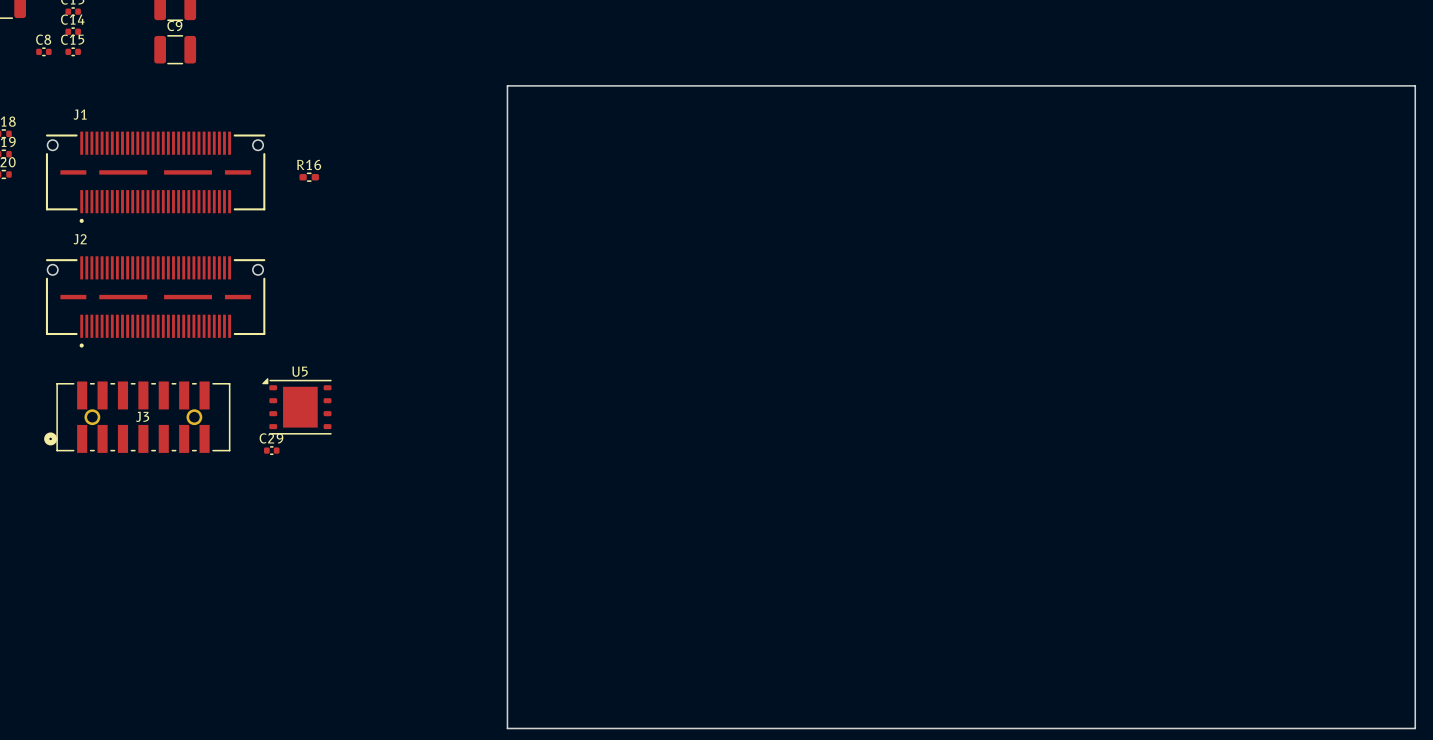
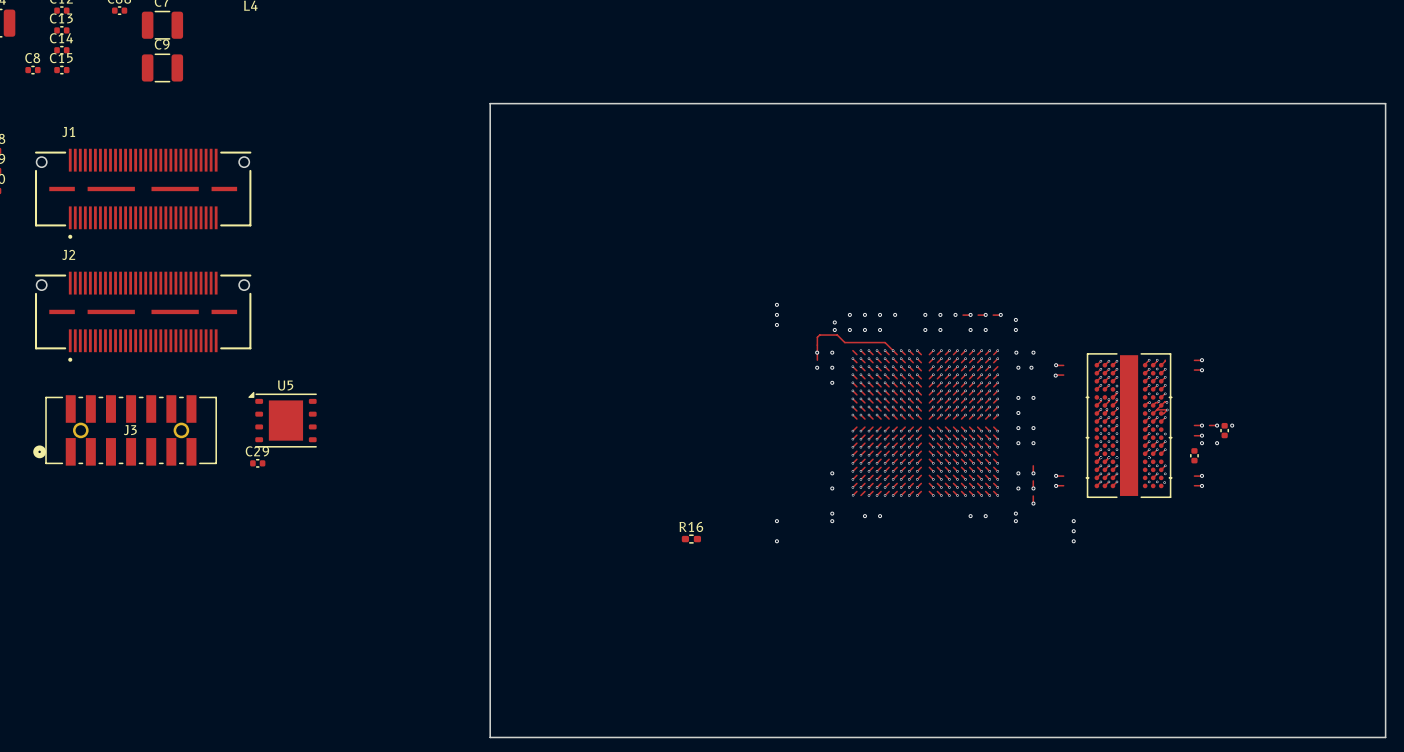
R16 position: (309, 177) -> (691, 539)
via: none -> (776, 304)
via: none -> (776, 314)
via: none -> (849, 314)
via: none -> (864, 314)
via: none -> (880, 314)
via: none -> (895, 314)
via: none -> (925, 314)
via: none -> (940, 314)
via: none -> (955, 314)
track: none -> (970, 314) (963, 315)
via: none -> (970, 314)
track: none -> (985, 314) (978, 315)
via: none -> (985, 314)
track: none -> (1000, 314) (993, 315)
via: none -> (1000, 314)
via: none -> (1015, 319)
via: none -> (834, 322)
via: none -> (776, 324)
via: none -> (834, 330)
via: none -> (849, 330)
via: none -> (864, 330)
via: none -> (880, 330)
via: none -> (925, 330)
via: none -> (940, 330)
via: none -> (970, 330)
via: none -> (985, 330)
via: none -> (1015, 330)
track: none -> (852, 350) (856, 354)
track: none -> (860, 350) (864, 354)
via: none -> (860, 350)
track: none -> (868, 350) (873, 354)
via: none -> (868, 350)
track: none -> (877, 350) (881, 354)
via: none -> (877, 350)
track: none -> (885, 350) (889, 354)
via: none -> (885, 350)
via: none -> (893, 350)
track: none -> (901, 350) (905, 354)
via: none -> (901, 350)
track: none -> (909, 350) (913, 354)
via: none -> (909, 350)
track: none -> (917, 350) (921, 354)
via: none -> (917, 350)
track: none -> (933, 350) (929, 354)
via: none -> (933, 350)
track: none -> (941, 350) (937, 354)
via: none -> (941, 350)
track: none -> (949, 350) (945, 354)
via: none -> (949, 350)
track: none -> (957, 350) (953, 354)
via: none -> (957, 350)
track: none -> (965, 350) (961, 354)
via: none -> (965, 350)
track: none -> (973, 350) (969, 354)
via: none -> (973, 350)
track: none -> (981, 350) (977, 354)
via: none -> (981, 350)
track: none -> (989, 350) (985, 354)
via: none -> (989, 350)
track: none -> (997, 350) (993, 354)
via: none -> (997, 350)
via: none -> (817, 352)
via: none -> (832, 352)
via: none -> (1016, 352)
via: none -> (1033, 352)
track: none -> (897, 354) (885, 342) (844, 342) (837, 335) (819, 335) (817, 337) (817, 360)
track: none -> (852, 358) (856, 362)
via: none -> (852, 358)
track: none -> (860, 358) (864, 362)
via: none -> (860, 358)
track: none -> (868, 358) (873, 362)
via: none -> (868, 358)
track: none -> (877, 358) (881, 362)
via: none -> (877, 358)
track: none -> (885, 358) (889, 362)
via: none -> (885, 358)
track: none -> (893, 358) (897, 362)
via: none -> (893, 358)
track: none -> (901, 358) (905, 362)
via: none -> (901, 358)
track: none -> (909, 358) (913, 362)
via: none -> (909, 358)
track: none -> (917, 358) (921, 362)
via: none -> (917, 358)
track: none -> (933, 358) (929, 362)
via: none -> (933, 358)
track: none -> (941, 358) (937, 362)
via: none -> (941, 358)
track: none -> (949, 358) (945, 362)
via: none -> (949, 358)
track: none -> (957, 358) (953, 362)
via: none -> (957, 358)
track: none -> (965, 358) (961, 362)
via: none -> (965, 358)
track: none -> (973, 358) (969, 362)
via: none -> (973, 358)
track: none -> (981, 358) (977, 362)
via: none -> (981, 358)
track: none -> (989, 358) (985, 362)
via: none -> (989, 358)
track: none -> (997, 358) (993, 362)
via: none -> (997, 358)
track: none -> (1149, 360) (1145, 365)
via: none -> (1149, 360)
track: none -> (1157, 360) (1153, 365)
via: none -> (1157, 360)
track: none -> (1165, 360) (1161, 365)
track: none -> (1202, 360) (1194, 360)
via: none -> (1202, 360)
track: none -> (1100, 361) (1096, 365)
via: none -> (1100, 361)
track: none -> (1108, 361) (1104, 365)
via: none -> (1108, 361)
track: none -> (1116, 361) (1112, 365)
via: none -> (1116, 361)
track: none -> (1056, 365) (1063, 365)
via: none -> (1056, 365)
track: none -> (852, 366) (856, 370)
via: none -> (852, 366)
track: none -> (860, 366) (864, 370)
via: none -> (860, 366)
track: none -> (868, 366) (873, 370)
via: none -> (868, 366)
track: none -> (877, 366) (881, 370)
via: none -> (877, 366)
track: none -> (885, 366) (889, 370)
via: none -> (885, 366)
track: none -> (893, 366) (897, 370)
via: none -> (893, 366)
track: none -> (901, 366) (905, 370)
via: none -> (901, 366)
track: none -> (909, 366) (913, 370)
via: none -> (909, 366)
track: none -> (917, 366) (921, 370)
via: none -> (917, 366)
track: none -> (933, 366) (929, 370)
via: none -> (933, 366)
track: none -> (941, 366) (937, 370)
via: none -> (941, 366)
track: none -> (949, 366) (945, 370)
via: none -> (949, 366)
track: none -> (957, 366) (953, 370)
via: none -> (957, 366)
track: none -> (965, 366) (961, 370)
via: none -> (965, 366)
track: none -> (973, 366) (969, 370)
via: none -> (973, 366)
track: none -> (981, 366) (977, 370)
via: none -> (981, 366)
track: none -> (989, 366) (985, 370)
via: none -> (989, 366)
track: none -> (997, 366) (993, 370)
via: none -> (817, 367)
via: none -> (832, 367)
via: none -> (1018, 367)
via: none -> (1031, 367)
via: none -> (1157, 369)
track: none -> (1100, 369) (1096, 373)
via: none -> (1100, 369)
track: none -> (1108, 369) (1104, 373)
via: none -> (1108, 369)
track: none -> (1116, 369) (1112, 373)
via: none -> (1116, 369)
track: none -> (1149, 369) (1145, 373)
via: none -> (1149, 369)
track: none -> (1165, 369) (1161, 373)
via: none -> (1165, 369)
track: none -> (1194, 370) (1202, 370)
via: none -> (1202, 370)
track: none -> (852, 374) (856, 378)
via: none -> (852, 374)
track: none -> (860, 374) (864, 378)
via: none -> (860, 374)
track: none -> (868, 374) (873, 378)
via: none -> (868, 374)
track: none -> (877, 374) (881, 378)
via: none -> (877, 374)
track: none -> (885, 374) (889, 378)
via: none -> (885, 374)
track: none -> (893, 374) (897, 378)
via: none -> (893, 374)
track: none -> (901, 374) (905, 378)
via: none -> (901, 374)
track: none -> (909, 374) (913, 378)
via: none -> (909, 374)
track: none -> (917, 374) (921, 378)
via: none -> (917, 374)
track: none -> (933, 374) (929, 378)
via: none -> (933, 374)
track: none -> (941, 374) (937, 378)
via: none -> (941, 374)
track: none -> (949, 374) (945, 378)
via: none -> (949, 374)
track: none -> (957, 374) (953, 378)
via: none -> (957, 374)
track: none -> (965, 374) (961, 378)
via: none -> (965, 374)
track: none -> (973, 374) (969, 378)
via: none -> (973, 374)
track: none -> (981, 374) (977, 378)
via: none -> (981, 374)
track: none -> (989, 374) (985, 378)
via: none -> (989, 374)
track: none -> (997, 374) (993, 378)
via: none -> (997, 374)
via: none -> (1055, 375)
track: none -> (1063, 375) (1055, 375)
track: none -> (1100, 377) (1096, 381)
via: none -> (1100, 377)
track: none -> (1108, 377) (1104, 381)
via: none -> (1108, 377)
track: none -> (1116, 377) (1112, 381)
via: none -> (1116, 377)
track: none -> (1149, 377) (1145, 381)
via: none -> (1149, 377)
track: none -> (1157, 377) (1153, 381)
via: none -> (1157, 377)
track: none -> (1165, 377) (1161, 381)
via: none -> (1165, 377)
via: none -> (832, 382)
track: none -> (852, 382) (856, 386)
via: none -> (852, 382)
track: none -> (860, 382) (864, 386)
via: none -> (860, 382)
track: none -> (868, 382) (873, 386)
via: none -> (868, 382)
track: none -> (877, 382) (881, 386)
via: none -> (877, 382)
track: none -> (885, 382) (889, 386)
via: none -> (885, 382)
track: none -> (893, 382) (897, 386)
via: none -> (893, 382)
track: none -> (901, 382) (905, 386)
via: none -> (901, 382)
track: none -> (909, 382) (913, 386)
via: none -> (909, 382)
track: none -> (917, 382) (921, 386)
via: none -> (917, 382)
track: none -> (933, 382) (929, 386)
via: none -> (933, 382)
track: none -> (941, 382) (937, 386)
via: none -> (941, 382)
track: none -> (949, 382) (945, 386)
via: none -> (949, 382)
track: none -> (957, 382) (953, 386)
via: none -> (957, 382)
track: none -> (965, 382) (961, 386)
via: none -> (965, 382)
track: none -> (973, 382) (969, 386)
via: none -> (973, 382)
track: none -> (981, 382) (977, 386)
via: none -> (981, 382)
track: none -> (989, 382) (985, 386)
via: none -> (989, 382)
track: none -> (997, 382) (993, 386)
via: none -> (997, 382)
track: none -> (1100, 385) (1096, 389)
via: none -> (1100, 385)
track: none -> (1108, 385) (1104, 389)
via: none -> (1108, 385)
track: none -> (1149, 385) (1145, 389)
via: none -> (1149, 385)
track: none -> (1157, 385) (1153, 389)
via: none -> (1157, 385)
track: none -> (1165, 385) (1161, 389)
via: none -> (1165, 385)
via: none -> (1116, 386)
track: none -> (852, 390) (856, 394)
via: none -> (852, 390)
track: none -> (860, 390) (864, 394)
via: none -> (860, 390)
track: none -> (868, 390) (873, 394)
via: none -> (868, 390)
track: none -> (877, 390) (881, 394)
via: none -> (877, 390)
track: none -> (885, 390) (889, 394)
via: none -> (885, 390)
track: none -> (893, 390) (897, 394)
via: none -> (893, 390)
track: none -> (901, 390) (905, 394)
via: none -> (901, 390)
track: none -> (909, 390) (913, 394)
via: none -> (909, 390)
track: none -> (917, 390) (921, 394)
via: none -> (917, 390)
track: none -> (933, 390) (929, 394)
via: none -> (933, 390)
track: none -> (941, 390) (937, 394)
via: none -> (941, 390)
track: none -> (949, 390) (945, 394)
via: none -> (949, 390)
track: none -> (957, 390) (953, 394)
via: none -> (957, 390)
track: none -> (965, 390) (961, 394)
via: none -> (965, 390)
track: none -> (973, 390) (969, 394)
via: none -> (973, 390)
track: none -> (981, 390) (977, 394)
via: none -> (981, 390)
track: none -> (989, 390) (985, 394)
via: none -> (989, 390)
track: none -> (997, 390) (993, 394)
via: none -> (997, 390)
via: none -> (1116, 392)
track: none -> (1116, 393) (1112, 397) (1116, 393)
via: none -> (1149, 393)
via: none -> (1157, 393)
track: none -> (1165, 393) (1161, 397)
via: none -> (1165, 393)
via: none -> (1018, 397)
via: none -> (1033, 397)
track: none -> (852, 398) (856, 402)
via: none -> (852, 398)
track: none -> (860, 398) (864, 402)
via: none -> (860, 398)
track: none -> (868, 398) (873, 402)
via: none -> (868, 398)
track: none -> (877, 398) (881, 402)
via: none -> (877, 398)
track: none -> (885, 398) (889, 402)
via: none -> (885, 398)
track: none -> (893, 398) (897, 402)
via: none -> (893, 398)
track: none -> (901, 398) (905, 402)
via: none -> (901, 398)
track: none -> (909, 398) (913, 402)
via: none -> (909, 398)
track: none -> (917, 398) (921, 402)
via: none -> (917, 398)
track: none -> (933, 398) (929, 402)
via: none -> (933, 398)
track: none -> (941, 398) (937, 402)
via: none -> (941, 398)
track: none -> (949, 398) (945, 402)
via: none -> (949, 398)
track: none -> (957, 398) (953, 402)
via: none -> (957, 398)
track: none -> (965, 398) (961, 402)
via: none -> (965, 398)
track: none -> (973, 398) (969, 402)
via: none -> (973, 398)
track: none -> (981, 398) (977, 402)
via: none -> (981, 398)
track: none -> (989, 398) (985, 402)
via: none -> (989, 398)
track: none -> (997, 398) (993, 402)
via: none -> (997, 398)
track: none -> (1100, 399) (1096, 405)
via: none -> (1100, 399)
track: none -> (1108, 399) (1104, 405)
via: none -> (1108, 399)
track: none -> (1116, 399) (1112, 405)
via: none -> (1116, 399)
track: none -> (1158, 401) (1153, 405)
via: none -> (1158, 401)
track: none -> (1166, 402) (1164, 401) (1157, 409) (1167, 409)
via: none -> (1166, 402)
track: none -> (1149, 402) (1145, 405)
via: none -> (1149, 402)
track: none -> (852, 406) (856, 410)
via: none -> (852, 406)
track: none -> (860, 406) (864, 410)
via: none -> (860, 406)
track: none -> (868, 406) (873, 410)
via: none -> (868, 406)
track: none -> (877, 406) (881, 410)
via: none -> (877, 406)
track: none -> (885, 406) (889, 410)
via: none -> (885, 406)
track: none -> (893, 406) (897, 410)
via: none -> (893, 406)
track: none -> (901, 406) (905, 410)
via: none -> (901, 406)
track: none -> (909, 406) (913, 410)
via: none -> (909, 406)
track: none -> (917, 406) (921, 410)
via: none -> (917, 406)
track: none -> (933, 406) (929, 410)
via: none -> (933, 406)
track: none -> (941, 406) (937, 410)
via: none -> (941, 406)
track: none -> (949, 406) (945, 410)
via: none -> (949, 406)
track: none -> (957, 406) (953, 410)
via: none -> (957, 406)
track: none -> (965, 406) (961, 410)
via: none -> (965, 406)
track: none -> (973, 406) (969, 410)
via: none -> (973, 406)
track: none -> (981, 406) (977, 410)
via: none -> (981, 406)
track: none -> (989, 406) (985, 410)
via: none -> (989, 406)
track: none -> (997, 406) (993, 410)
via: none -> (997, 406)
track: none -> (1117, 408) (1112, 413)
via: none -> (1117, 408)
track: none -> (1100, 409) (1096, 413)
via: none -> (1100, 409)
track: none -> (1106, 409) (1104, 413)
via: none -> (1106, 409)
via: none -> (1149, 410)
track: none -> (1157, 409) (1153, 413)
track: none -> (1167, 409) (1161, 413)
via: none -> (1167, 409)
via: none -> (1018, 413)
track: none -> (852, 415) (856, 419)
via: none -> (852, 415)
track: none -> (860, 415) (864, 419)
via: none -> (860, 415)
track: none -> (868, 415) (873, 419)
via: none -> (868, 415)
track: none -> (877, 415) (881, 419)
via: none -> (877, 415)
track: none -> (885, 415) (889, 419)
via: none -> (885, 415)
track: none -> (893, 415) (897, 419)
via: none -> (893, 415)
track: none -> (901, 415) (905, 419)
via: none -> (901, 415)
track: none -> (909, 415) (913, 419)
via: none -> (909, 415)
track: none -> (917, 415) (921, 419)
via: none -> (917, 415)
track: none -> (933, 415) (929, 419)
via: none -> (933, 415)
track: none -> (941, 415) (937, 419)
via: none -> (941, 415)
track: none -> (949, 415) (945, 419)
via: none -> (949, 415)
track: none -> (957, 415) (953, 419)
via: none -> (957, 415)
track: none -> (965, 415) (961, 419)
via: none -> (965, 415)
track: none -> (973, 415) (969, 419)
via: none -> (973, 415)
track: none -> (981, 415) (977, 419)
via: none -> (981, 415)
track: none -> (989, 415) (985, 419)
via: none -> (989, 415)
track: none -> (997, 415) (993, 419)
via: none -> (997, 415)
track: none -> (1100, 417) (1096, 421)
via: none -> (1100, 417)
track: none -> (1108, 417) (1104, 421)
via: none -> (1108, 417)
track: none -> (1116, 417) (1112, 421) (1116, 417)
via: none -> (1116, 417)
track: none -> (1149, 417) (1145, 421)
via: none -> (1149, 417)
track: none -> (1157, 417) (1153, 421) (1157, 417)
via: none -> (1157, 417)
track: none -> (1165, 417) (1161, 421)
via: none -> (1165, 417)
via: none -> (1100, 426)
via: none -> (1108, 426)
track: none -> (1116, 425) (1112, 429)
via: none -> (1116, 425)
part: none -> (1129, 425)
track: none -> (1149, 425) (1145, 429)
via: none -> (1149, 425)
via: none -> (1157, 426)
track: none -> (1194, 425) (1201, 425)
via: none -> (1202, 425)
track: none -> (1209, 425) (1216, 425)
via: none -> (1217, 425)
via: none -> (1232, 425)
track: none -> (856, 427) (852, 431)
track: none -> (864, 427) (860, 431)
track: none -> (873, 427) (868, 431)
track: none -> (881, 427) (877, 431)
track: none -> (889, 427) (885, 431)
track: none -> (897, 427) (893, 431)
track: none -> (905, 427) (901, 431)
track: none -> (913, 427) (909, 431)
track: none -> (921, 427) (917, 431)
track: none -> (929, 427) (933, 431)
track: none -> (937, 427) (941, 431)
track: none -> (945, 427) (949, 431)
track: none -> (953, 427) (957, 431)
track: none -> (961, 427) (965, 431)
track: none -> (969, 427) (973, 431)
track: none -> (977, 427) (981, 431)
track: none -> (985, 427) (989, 431)
track: none -> (993, 427) (997, 431)
via: none -> (1018, 428)
via: none -> (1033, 428)
via: none -> (852, 431)
via: none -> (860, 431)
via: none -> (868, 431)
via: none -> (877, 431)
via: none -> (885, 431)
via: none -> (893, 431)
via: none -> (901, 431)
via: none -> (909, 431)
via: none -> (917, 431)
via: none -> (933, 431)
via: none -> (941, 431)
via: none -> (949, 431)
via: none -> (957, 431)
via: none -> (965, 431)
via: none -> (973, 431)
via: none -> (981, 431)
via: none -> (989, 431)
via: none -> (997, 431)
part: none -> (1224, 430)
via: none -> (1100, 433)
via: none -> (1108, 433)
via: none -> (1116, 433)
track: none -> (1149, 433) (1145, 437)
via: none -> (1149, 433)
via: none -> (1157, 434)
via: none -> (1165, 434)
track: none -> (856, 435) (852, 439)
track: none -> (864, 435) (860, 439)
track: none -> (873, 435) (868, 439)
track: none -> (881, 435) (877, 439)
track: none -> (889, 435) (885, 439)
track: none -> (897, 435) (893, 439)
track: none -> (905, 435) (901, 439)
track: none -> (913, 435) (909, 439)
track: none -> (921, 435) (917, 439)
track: none -> (929, 435) (933, 439)
track: none -> (937, 435) (941, 439)
track: none -> (945, 435) (949, 439)
track: none -> (953, 435) (957, 439)
track: none -> (961, 435) (965, 439)
track: none -> (969, 435) (973, 439)
track: none -> (977, 435) (981, 439)
track: none -> (985, 435) (989, 439)
track: none -> (993, 435) (997, 439)
track: none -> (1194, 435) (1201, 435)
via: none -> (1202, 435)
via: none -> (852, 439)
via: none -> (860, 439)
via: none -> (868, 439)
via: none -> (877, 439)
via: none -> (885, 439)
via: none -> (893, 439)
via: none -> (901, 439)
via: none -> (909, 439)
via: none -> (917, 439)
via: none -> (933, 439)
via: none -> (941, 439)
via: none -> (949, 439)
via: none -> (957, 439)
via: none -> (965, 439)
via: none -> (973, 439)
via: none -> (981, 439)
via: none -> (989, 439)
via: none -> (997, 439)
via: none -> (1100, 441)
via: none -> (1108, 441)
via: none -> (1116, 441)
track: none -> (1149, 441) (1145, 445)
via: none -> (1149, 441)
track: none -> (1157, 441) (1153, 445)
via: none -> (1157, 441)
track: none -> (1165, 441) (1161, 445)
via: none -> (1165, 441)
track: none -> (856, 443) (852, 447)
track: none -> (864, 443) (860, 447)
track: none -> (873, 443) (868, 447)
track: none -> (881, 443) (877, 447)
track: none -> (889, 443) (885, 447)
track: none -> (897, 443) (893, 447)
track: none -> (905, 443) (901, 447)
track: none -> (913, 443) (909, 447)
track: none -> (921, 443) (917, 447)
track: none -> (929, 443) (933, 447)
track: none -> (937, 443) (941, 447)
track: none -> (945, 443) (949, 447)
track: none -> (953, 443) (957, 447)
track: none -> (961, 443) (965, 447)
track: none -> (969, 443) (973, 447)
track: none -> (977, 443) (981, 447)
track: none -> (985, 443) (989, 447)
track: none -> (993, 443) (997, 447)
via: none -> (1018, 443)
via: none -> (1033, 443)
via: none -> (1202, 443)
via: none -> (1217, 443)
via: none -> (852, 447)
via: none -> (860, 447)
via: none -> (868, 447)
via: none -> (877, 447)
via: none -> (885, 447)
via: none -> (893, 447)
via: none -> (901, 447)
via: none -> (909, 447)
via: none -> (917, 447)
via: none -> (933, 447)
via: none -> (941, 447)
via: none -> (949, 447)
via: none -> (957, 447)
via: none -> (965, 447)
via: none -> (973, 447)
via: none -> (981, 447)
via: none -> (989, 447)
via: none -> (997, 447)
track: none -> (1100, 449) (1096, 453)
via: none -> (1100, 449)
via: none -> (1108, 449)
via: none -> (1116, 449)
track: none -> (1149, 449) (1145, 453)
via: none -> (1149, 449)
track: none -> (1157, 449) (1153, 453)
via: none -> (1157, 449)
track: none -> (1165, 449) (1161, 453)
via: none -> (1165, 449)
track: none -> (856, 451) (852, 455)
track: none -> (864, 451) (860, 455)
track: none -> (873, 451) (868, 455)
track: none -> (881, 451) (877, 455)
track: none -> (889, 451) (885, 455)
track: none -> (897, 451) (893, 455)
track: none -> (905, 451) (901, 455)
track: none -> (913, 451) (909, 455)
track: none -> (921, 451) (917, 455)
track: none -> (929, 451) (933, 455)
track: none -> (937, 451) (941, 455)
track: none -> (945, 451) (949, 455)
track: none -> (953, 451) (957, 455)
track: none -> (961, 451) (965, 455)
track: none -> (969, 451) (973, 455)
track: none -> (977, 451) (981, 455)
track: none -> (985, 451) (989, 455)
track: none -> (993, 451) (997, 455)
via: none -> (852, 455)
via: none -> (860, 455)
via: none -> (868, 455)
via: none -> (877, 455)
via: none -> (885, 455)
via: none -> (893, 455)
via: none -> (901, 455)
via: none -> (909, 455)
via: none -> (917, 455)
via: none -> (933, 455)
via: none -> (941, 455)
via: none -> (949, 455)
via: none -> (957, 455)
via: none -> (965, 455)
via: none -> (973, 455)
via: none -> (981, 455)
via: none -> (989, 455)
part: none -> (1194, 455)
track: none -> (1100, 457) (1096, 461)
via: none -> (1100, 457)
via: none -> (1100, 457)
track: none -> (1108, 457) (1104, 461)
via: none -> (1108, 457)
via: none -> (1108, 457)
via: none -> (1116, 457)
via: none -> (1116, 457)
via: none -> (1149, 457)
via: none -> (1149, 457)
track: none -> (856, 459) (852, 463)
track: none -> (864, 459) (860, 463)
track: none -> (873, 459) (868, 463)
track: none -> (881, 459) (877, 463)
track: none -> (889, 459) (885, 463)
track: none -> (897, 459) (893, 463)
track: none -> (905, 459) (901, 463)
track: none -> (913, 459) (909, 463)
track: none -> (921, 459) (917, 463)
track: none -> (929, 459) (933, 463)
track: none -> (937, 459) (941, 463)
track: none -> (945, 459) (949, 463)
track: none -> (953, 459) (957, 463)
track: none -> (961, 459) (965, 463)
track: none -> (969, 459) (973, 463)
track: none -> (977, 459) (981, 463)
track: none -> (985, 459) (989, 463)
track: none -> (993, 459) (997, 463)
via: none -> (852, 463)
via: none -> (860, 463)
via: none -> (868, 463)
via: none -> (877, 463)
via: none -> (885, 463)
via: none -> (893, 463)
via: none -> (901, 463)
via: none -> (909, 463)
via: none -> (917, 463)
via: none -> (933, 463)
via: none -> (941, 463)
via: none -> (949, 463)
via: none -> (957, 463)
via: none -> (965, 463)
via: none -> (973, 463)
via: none -> (981, 463)
via: none -> (989, 463)
via: none -> (997, 463)
track: none -> (1033, 465) (1033, 473)
track: none -> (1100, 465) (1096, 469)
via: none -> (1100, 465)
track: none -> (1108, 465) (1104, 469)
via: none -> (1108, 465)
track: none -> (1116, 465) (1112, 469)
via: none -> (1116, 465)
via: none -> (1149, 465)
via: none -> (1157, 465)
track: none -> (1165, 465) (1161, 469)
via: none -> (1165, 465)
track: none -> (856, 467) (852, 471)
track: none -> (864, 467) (860, 471)
track: none -> (873, 467) (868, 471)
track: none -> (881, 467) (877, 471)
track: none -> (889, 467) (885, 471)
track: none -> (897, 467) (893, 471)
track: none -> (905, 467) (901, 471)
track: none -> (913, 467) (909, 471)
track: none -> (921, 467) (917, 471)
track: none -> (929, 467) (933, 471)
track: none -> (937, 467) (941, 471)
track: none -> (945, 467) (949, 471)
track: none -> (953, 467) (957, 471)
track: none -> (961, 467) (965, 471)
track: none -> (969, 467) (973, 471)
track: none -> (977, 467) (981, 471)
track: none -> (985, 467) (989, 471)
track: none -> (993, 467) (997, 471)
via: none -> (852, 471)
via: none -> (860, 471)
via: none -> (868, 471)
via: none -> (877, 471)
via: none -> (885, 471)
via: none -> (893, 471)
via: none -> (901, 471)
via: none -> (909, 471)
via: none -> (917, 471)
via: none -> (933, 471)
via: none -> (941, 471)
via: none -> (949, 471)
via: none -> (957, 471)
via: none -> (965, 471)
via: none -> (973, 471)
via: none -> (981, 471)
via: none -> (989, 471)
via: none -> (997, 471)
via: none -> (832, 473)
via: none -> (1018, 473)
via: none -> (1033, 473)
track: none -> (1100, 473) (1096, 477)
via: none -> (1100, 473)
track: none -> (1108, 473) (1104, 477)
via: none -> (1108, 473)
track: none -> (1116, 473) (1112, 477)
via: none -> (1116, 473)
via: none -> (1149, 473)
track: none -> (1157, 473) (1153, 477)
via: none -> (1157, 473)
via: none -> (1165, 473)
track: none -> (856, 475) (852, 479)
track: none -> (864, 475) (860, 479)
track: none -> (873, 475) (868, 479)
track: none -> (881, 475) (877, 479)
track: none -> (889, 475) (885, 479)
track: none -> (897, 475) (893, 479)
track: none -> (905, 475) (901, 479)
track: none -> (913, 475) (909, 479)
track: none -> (921, 475) (917, 479)
track: none -> (929, 475) (933, 479)
track: none -> (937, 475) (941, 479)
track: none -> (945, 475) (949, 479)
track: none -> (953, 475) (957, 479)
track: none -> (961, 475) (965, 479)
track: none -> (969, 475) (973, 479)
track: none -> (977, 475) (981, 479)
track: none -> (985, 475) (989, 479)
track: none -> (993, 475) (997, 479)
track: none -> (1056, 475) (1063, 476)
via: none -> (1056, 475)
track: none -> (1202, 475) (1194, 476)
via: none -> (1202, 475)
via: none -> (852, 479)
via: none -> (860, 479)
via: none -> (868, 479)
via: none -> (877, 479)
via: none -> (885, 479)
via: none -> (893, 479)
via: none -> (901, 479)
via: none -> (909, 479)
via: none -> (917, 479)
via: none -> (933, 479)
via: none -> (941, 479)
via: none -> (949, 479)
via: none -> (957, 479)
via: none -> (965, 479)
via: none -> (973, 479)
via: none -> (981, 479)
via: none -> (989, 479)
via: none -> (997, 479)
track: none -> (1033, 480) (1033, 488)
track: none -> (1100, 481) (1096, 485)
via: none -> (1100, 481)
track: none -> (1108, 481) (1104, 485)
via: none -> (1108, 481)
track: none -> (1116, 481) (1112, 485)
via: none -> (1116, 481)
via: none -> (1149, 481)
via: none -> (1157, 481)
track: none -> (856, 483) (852, 487)
track: none -> (864, 483) (860, 487)
track: none -> (873, 483) (868, 487)
track: none -> (881, 483) (877, 487)
track: none -> (889, 483) (885, 487)
track: none -> (897, 483) (893, 487)
track: none -> (905, 483) (901, 487)
track: none -> (913, 483) (909, 487)
track: none -> (921, 483) (917, 487)
track: none -> (929, 483) (933, 487)
track: none -> (937, 483) (941, 487)
track: none -> (945, 483) (949, 487)
track: none -> (953, 483) (957, 487)
track: none -> (961, 483) (965, 487)
track: none -> (969, 483) (973, 487)
track: none -> (977, 483) (981, 487)
track: none -> (985, 483) (989, 487)
track: none -> (993, 483) (997, 487)
via: none -> (1164, 482)
via: none -> (1056, 485)
track: none -> (1063, 485) (1056, 485)
track: none -> (1194, 485) (1202, 485)
via: none -> (1202, 485)
via: none -> (852, 487)
via: none -> (860, 487)
via: none -> (868, 487)
via: none -> (877, 487)
via: none -> (885, 487)
via: none -> (893, 487)
via: none -> (901, 487)
via: none -> (909, 487)
via: none -> (917, 487)
via: none -> (933, 487)
via: none -> (941, 487)
via: none -> (949, 487)
via: none -> (957, 487)
via: none -> (965, 487)
via: none -> (973, 487)
via: none -> (981, 487)
via: none -> (989, 487)
via: none -> (997, 487)
via: none -> (832, 488)
via: none -> (1018, 488)
via: none -> (1033, 488)
track: none -> (856, 491) (853, 495)
track: none -> (864, 491) (860, 495)
track: none -> (873, 491) (868, 495)
track: none -> (881, 491) (877, 495)
track: none -> (889, 491) (885, 495)
track: none -> (897, 491) (893, 495)
track: none -> (905, 491) (901, 495)
track: none -> (913, 491) (909, 495)
track: none -> (921, 491) (917, 495)
track: none -> (929, 491) (933, 495)
track: none -> (937, 491) (941, 495)
track: none -> (945, 491) (949, 495)
track: none -> (953, 491) (957, 495)
track: none -> (961, 491) (965, 495)
track: none -> (969, 491) (973, 495)
track: none -> (977, 491) (981, 495)
track: none -> (985, 491) (989, 495)
track: none -> (993, 491) (997, 495)
via: none -> (853, 495)
via: none -> (868, 495)
via: none -> (877, 495)
via: none -> (885, 495)
via: none -> (893, 495)
via: none -> (901, 495)
via: none -> (909, 495)
via: none -> (917, 495)
via: none -> (933, 495)
via: none -> (941, 495)
via: none -> (949, 495)
via: none -> (957, 495)
via: none -> (965, 495)
via: none -> (973, 495)
via: none -> (981, 495)
via: none -> (989, 495)
via: none -> (997, 495)
track: none -> (1033, 496) (1033, 503)
via: none -> (1033, 503)
via: none -> (832, 513)
via: none -> (1015, 513)
via: none -> (864, 516)
via: none -> (880, 516)
via: none -> (970, 516)
via: none -> (985, 516)
via: none -> (776, 521)
via: none -> (832, 521)
via: none -> (1015, 521)
via: none -> (1073, 521)
via: none -> (1073, 531)
via: none -> (776, 541)
via: none -> (1073, 541)

